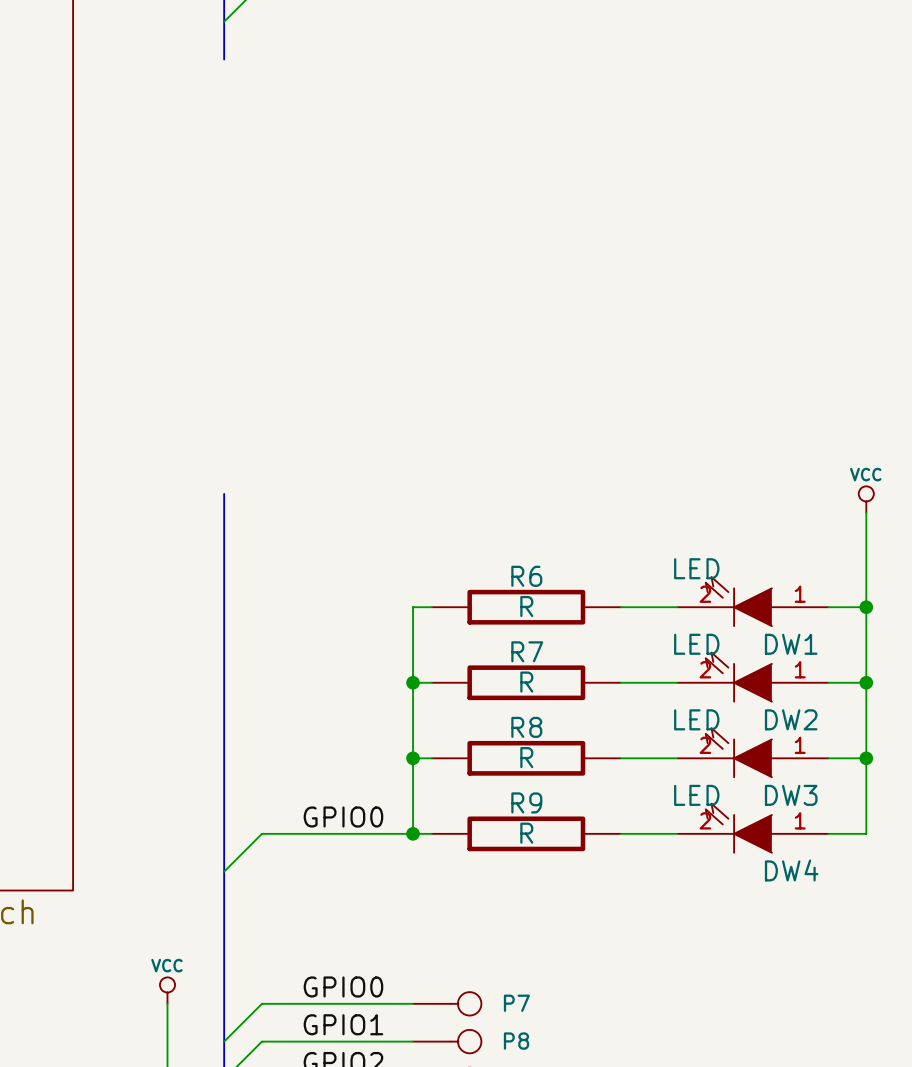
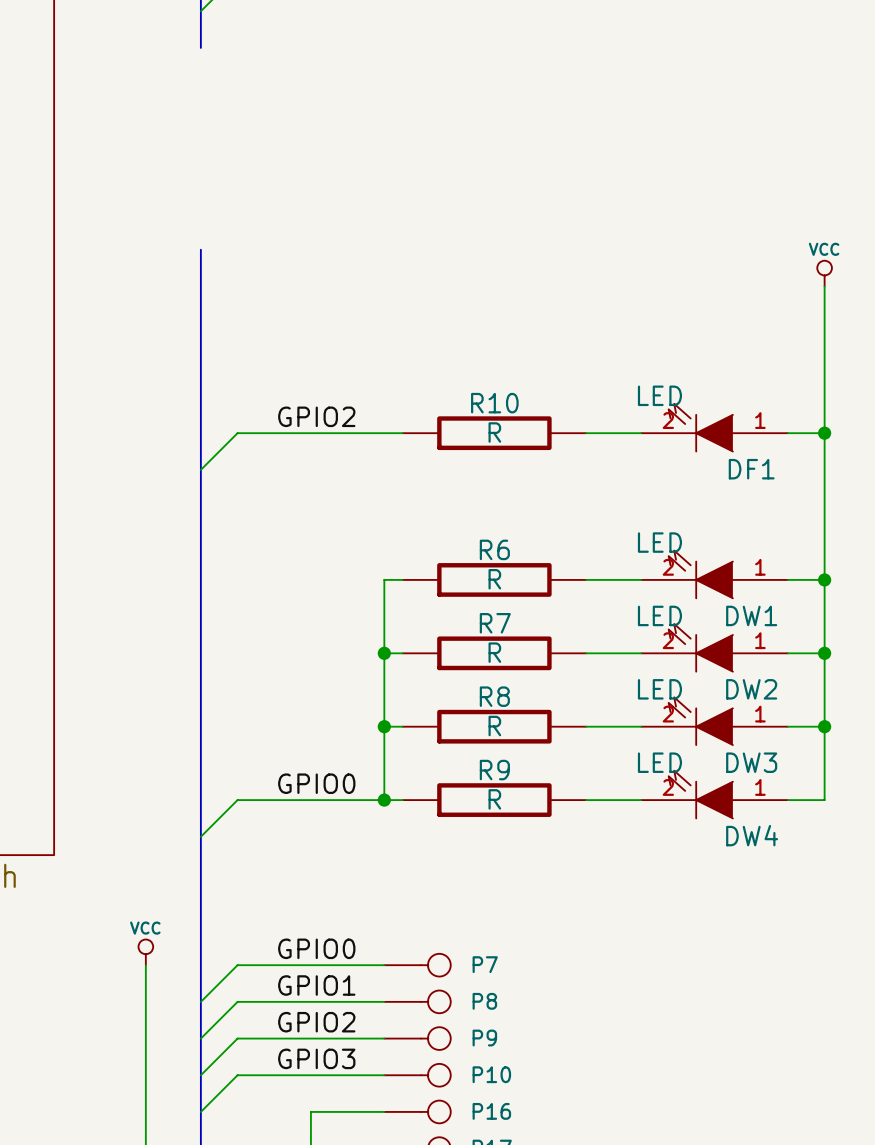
bus: none -> (200, 249) (200, 469)
wire: none -> (824, 286) (824, 488)
label: none -> GPIO2 (316, 416)
DF1: none -> LED (714, 427)
wire: none -> (402, 433) (237, 433) (200, 469)
R10: none -> R (494, 433)
wire: none -> (586, 433) (641, 433)
wire: none -> (787, 433) (824, 433)
junction: none -> (824, 433)
power symbol position: VCC (866, 499) -> VCC (824, 273)

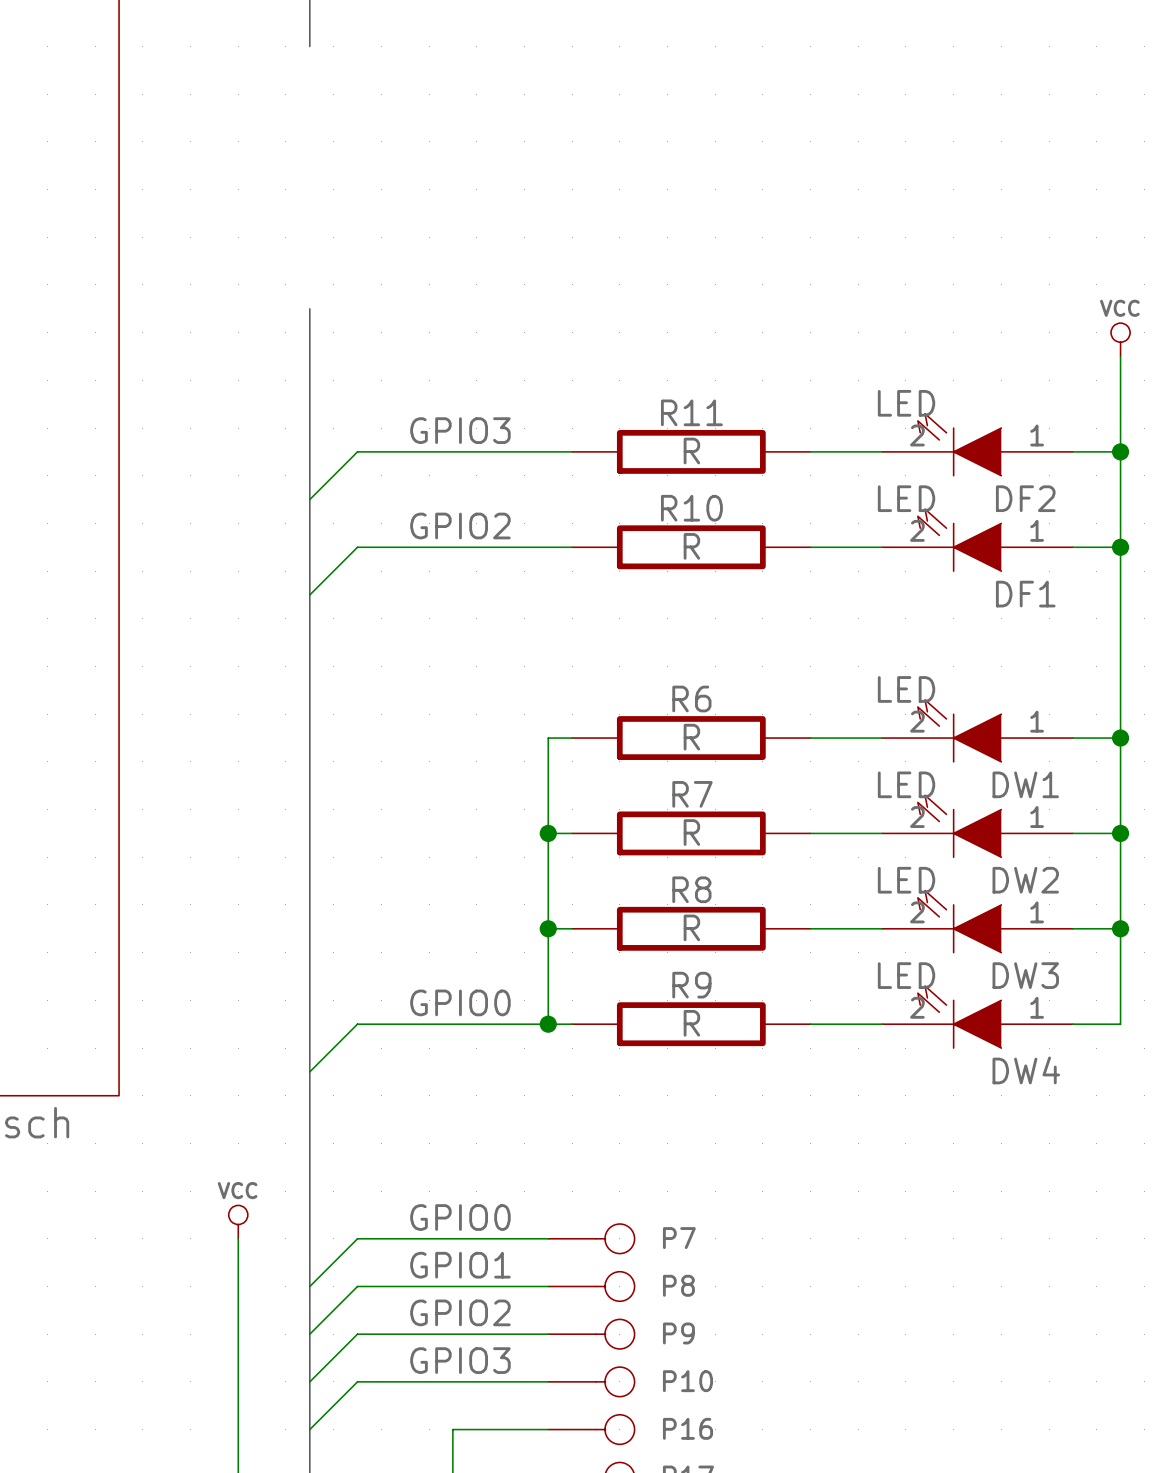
label: none -> GPIO3 (460, 430)
DF2: none -> LED (977, 444)
wire: none -> (572, 451) (357, 451) (309, 499)
R11: none -> R (691, 451)
wire: none -> (810, 451) (882, 451)
wire: none -> (1072, 451) (1120, 451)
junction: none -> (1120, 451)

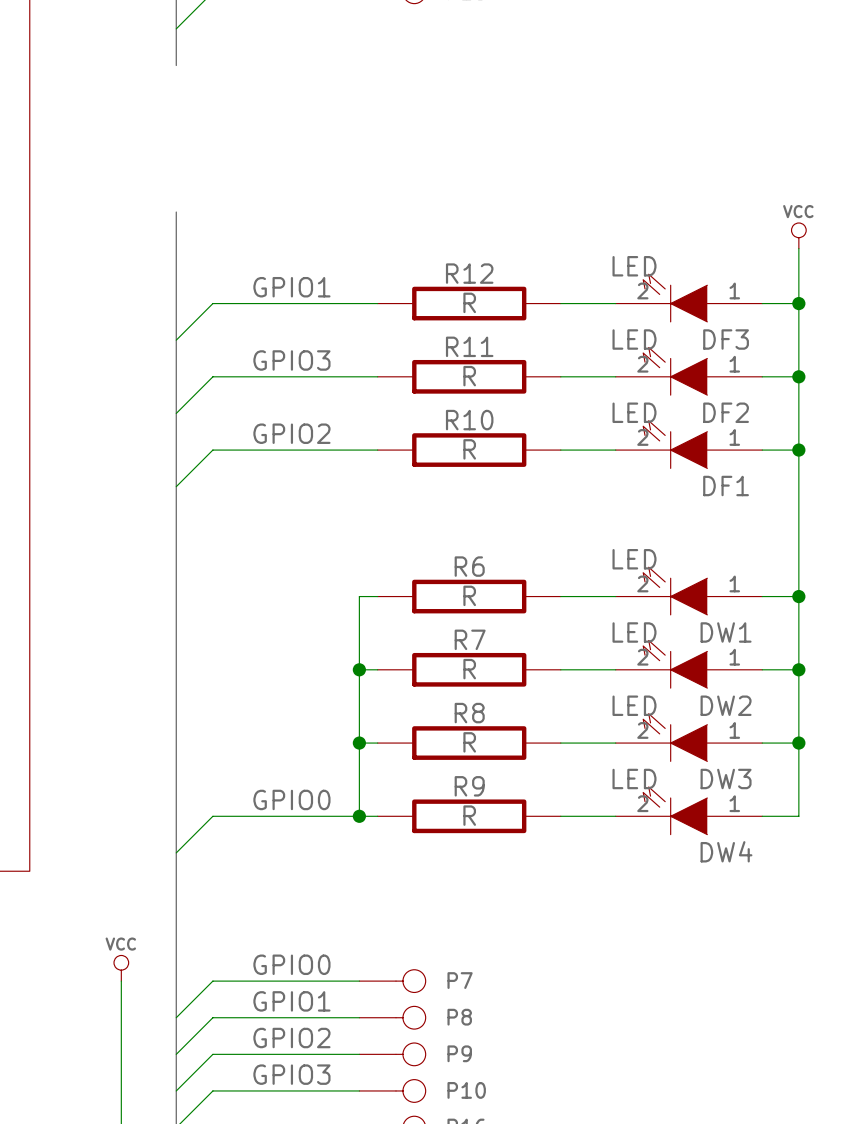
bus: none -> (176, 212) (176, 266)
wire: none -> (798, 248) (798, 303) (762, 303)
label: none -> GPIO1 (291, 287)
power symbol position: VCC (1120, 339) -> VCC (798, 235)
DF3: none -> LED (688, 298)
wire: none -> (377, 303) (212, 303) (176, 340)
R12: none -> R (469, 303)
wire: none -> (560, 303) (615, 303)
junction: none -> (798, 303)

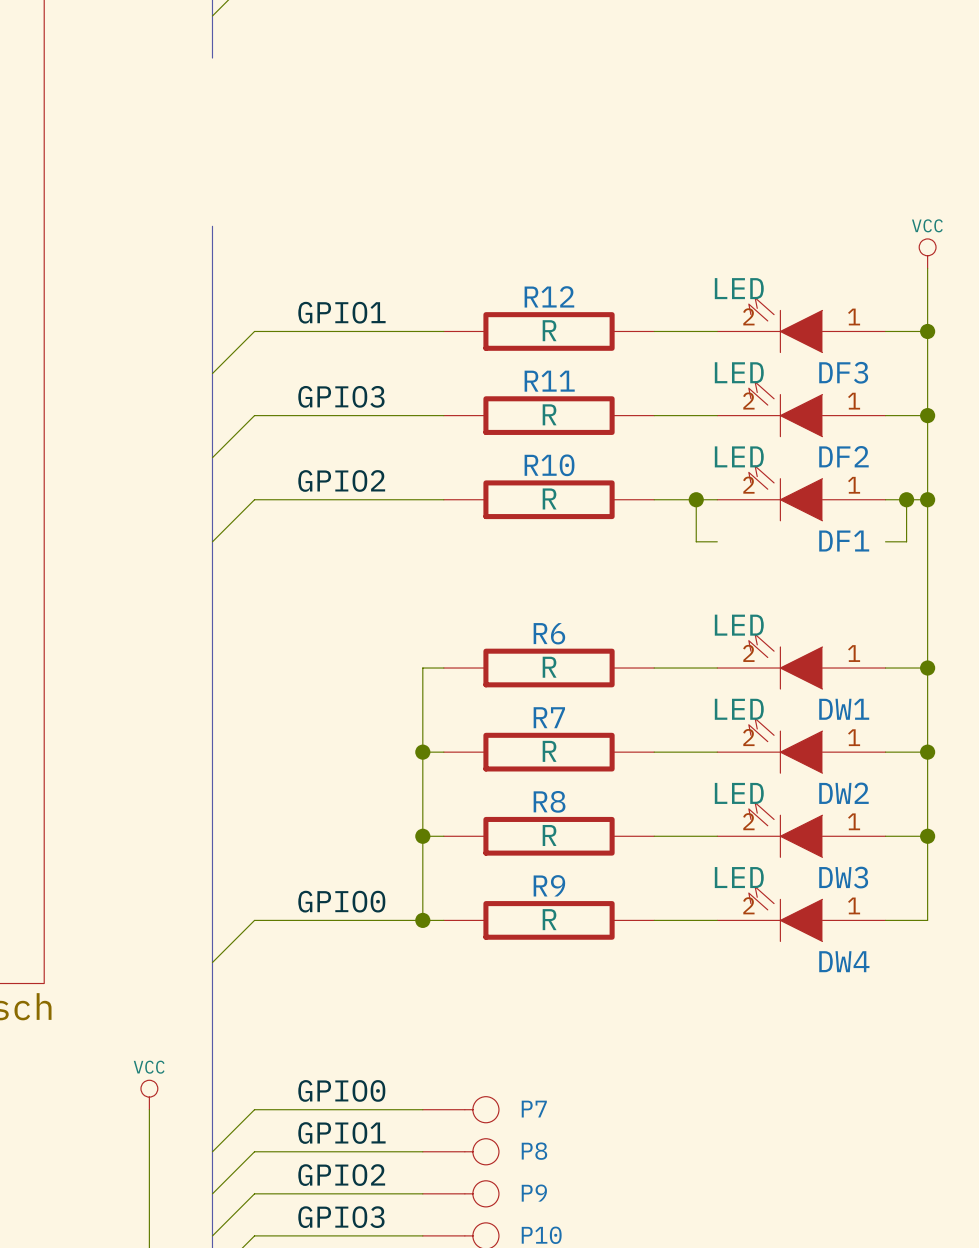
wire: none -> (696, 499) (696, 541) (717, 541)
junction: none -> (696, 499)
wire: none -> (906, 499) (906, 541) (885, 541)
junction: none -> (906, 499)

